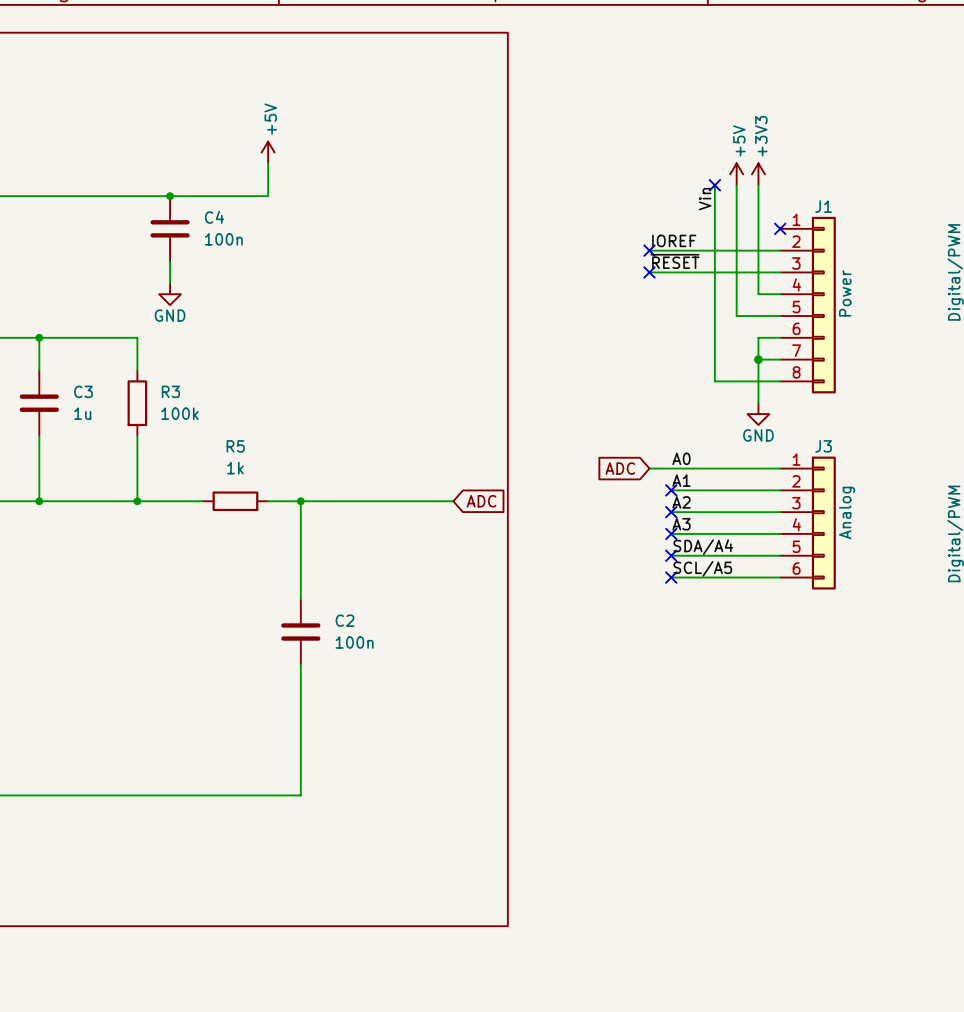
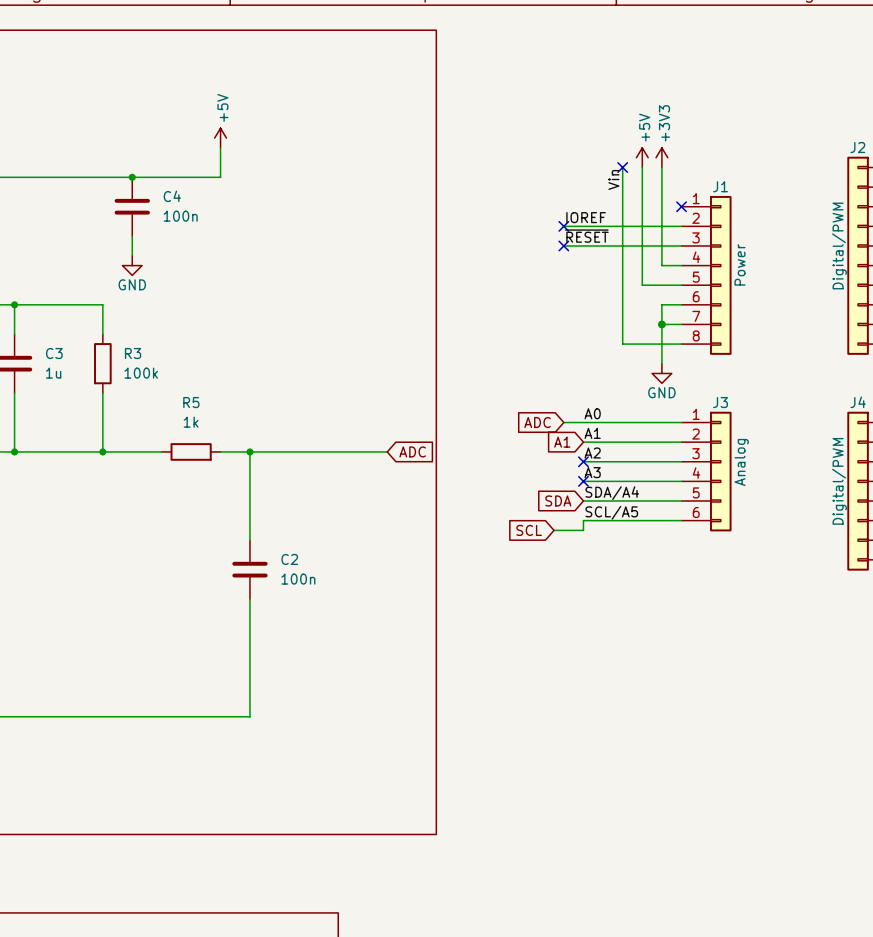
global label: none -> A1 (562, 442)
no-connect mark: (671, 490) -> none
global label: none -> SDA (558, 500)
no-connect mark: (671, 555) -> none
wire: none -> (583, 520) (583, 530) (554, 530)
no-connect mark: (671, 577) -> none
global label: none -> SCL (529, 530)

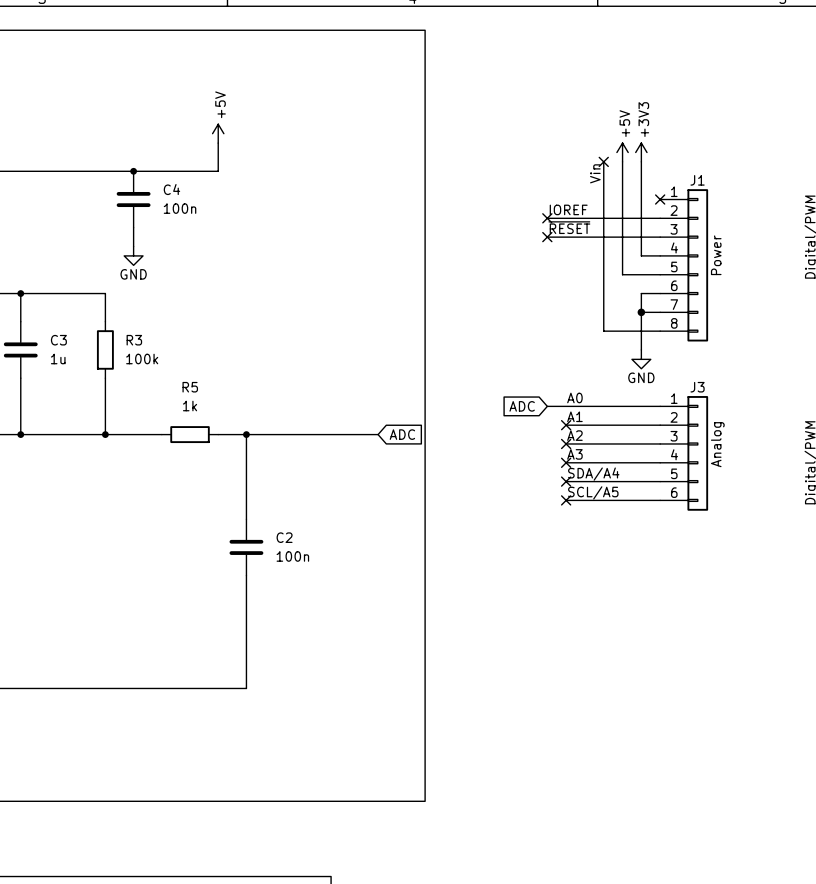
global label: A1 (562, 442) -> none
no-connect mark: none -> (566, 425)
global label: SDA (558, 500) -> none
no-connect mark: none -> (566, 481)
wire: (583, 520) (583, 530) (554, 530) -> none
no-connect mark: none -> (566, 500)
global label: SCL (529, 530) -> none

